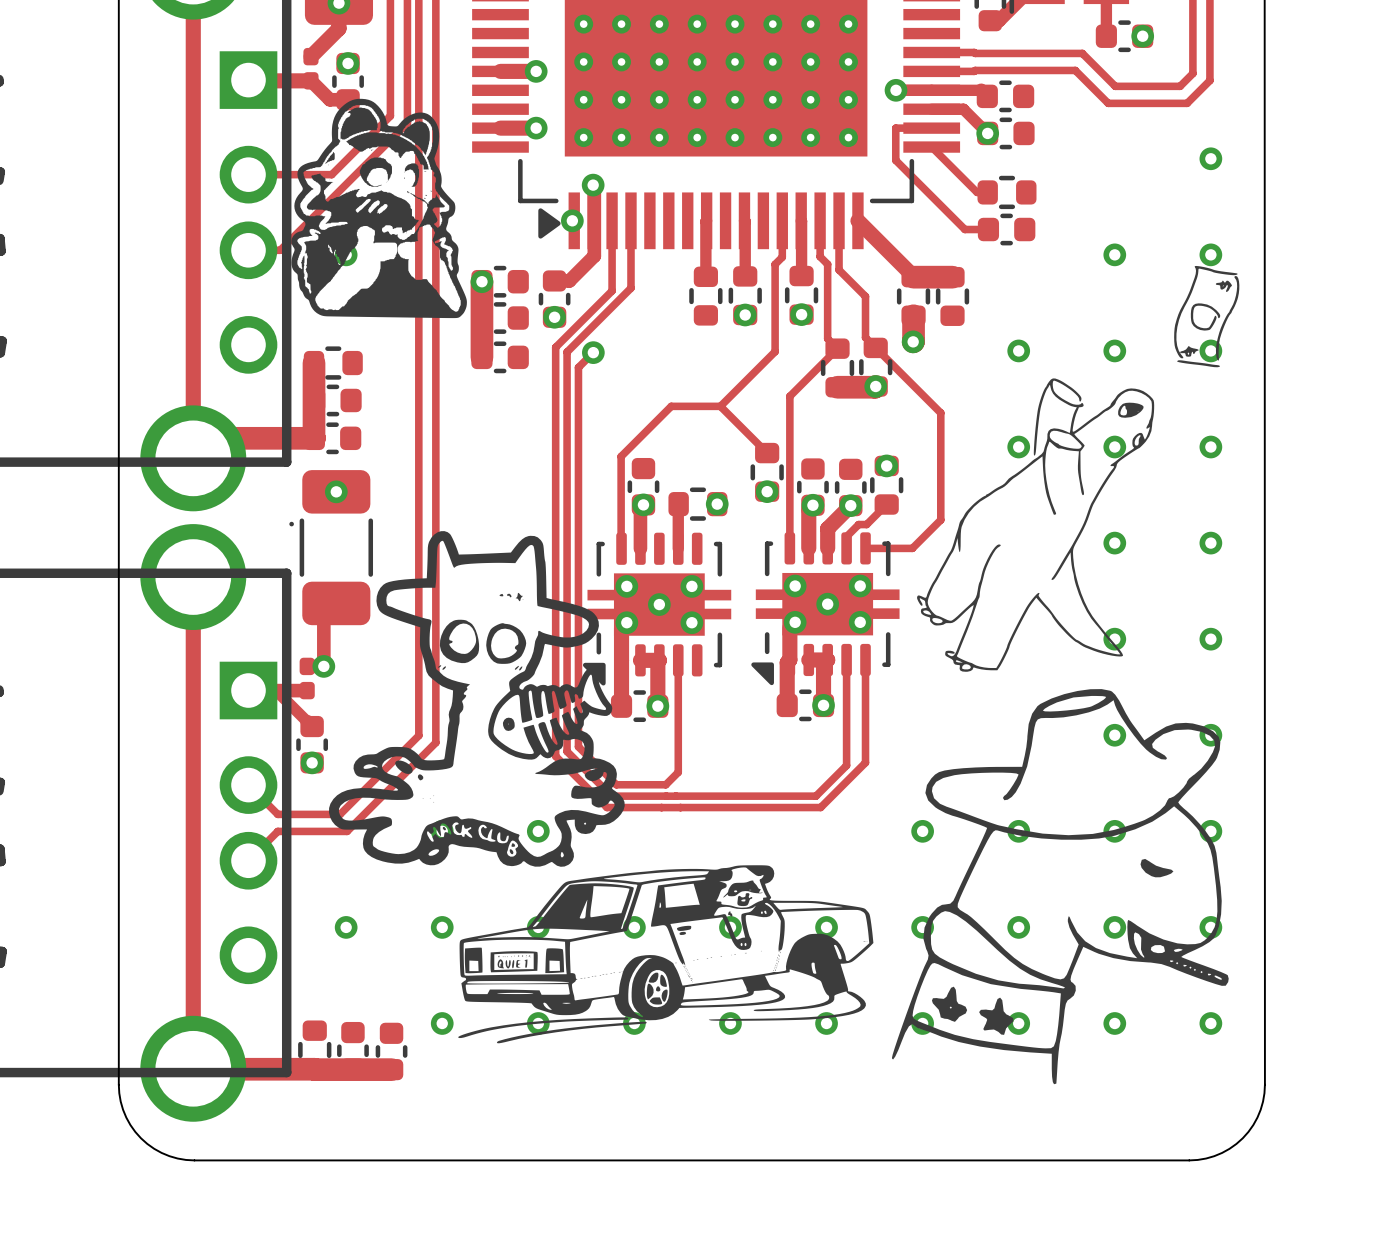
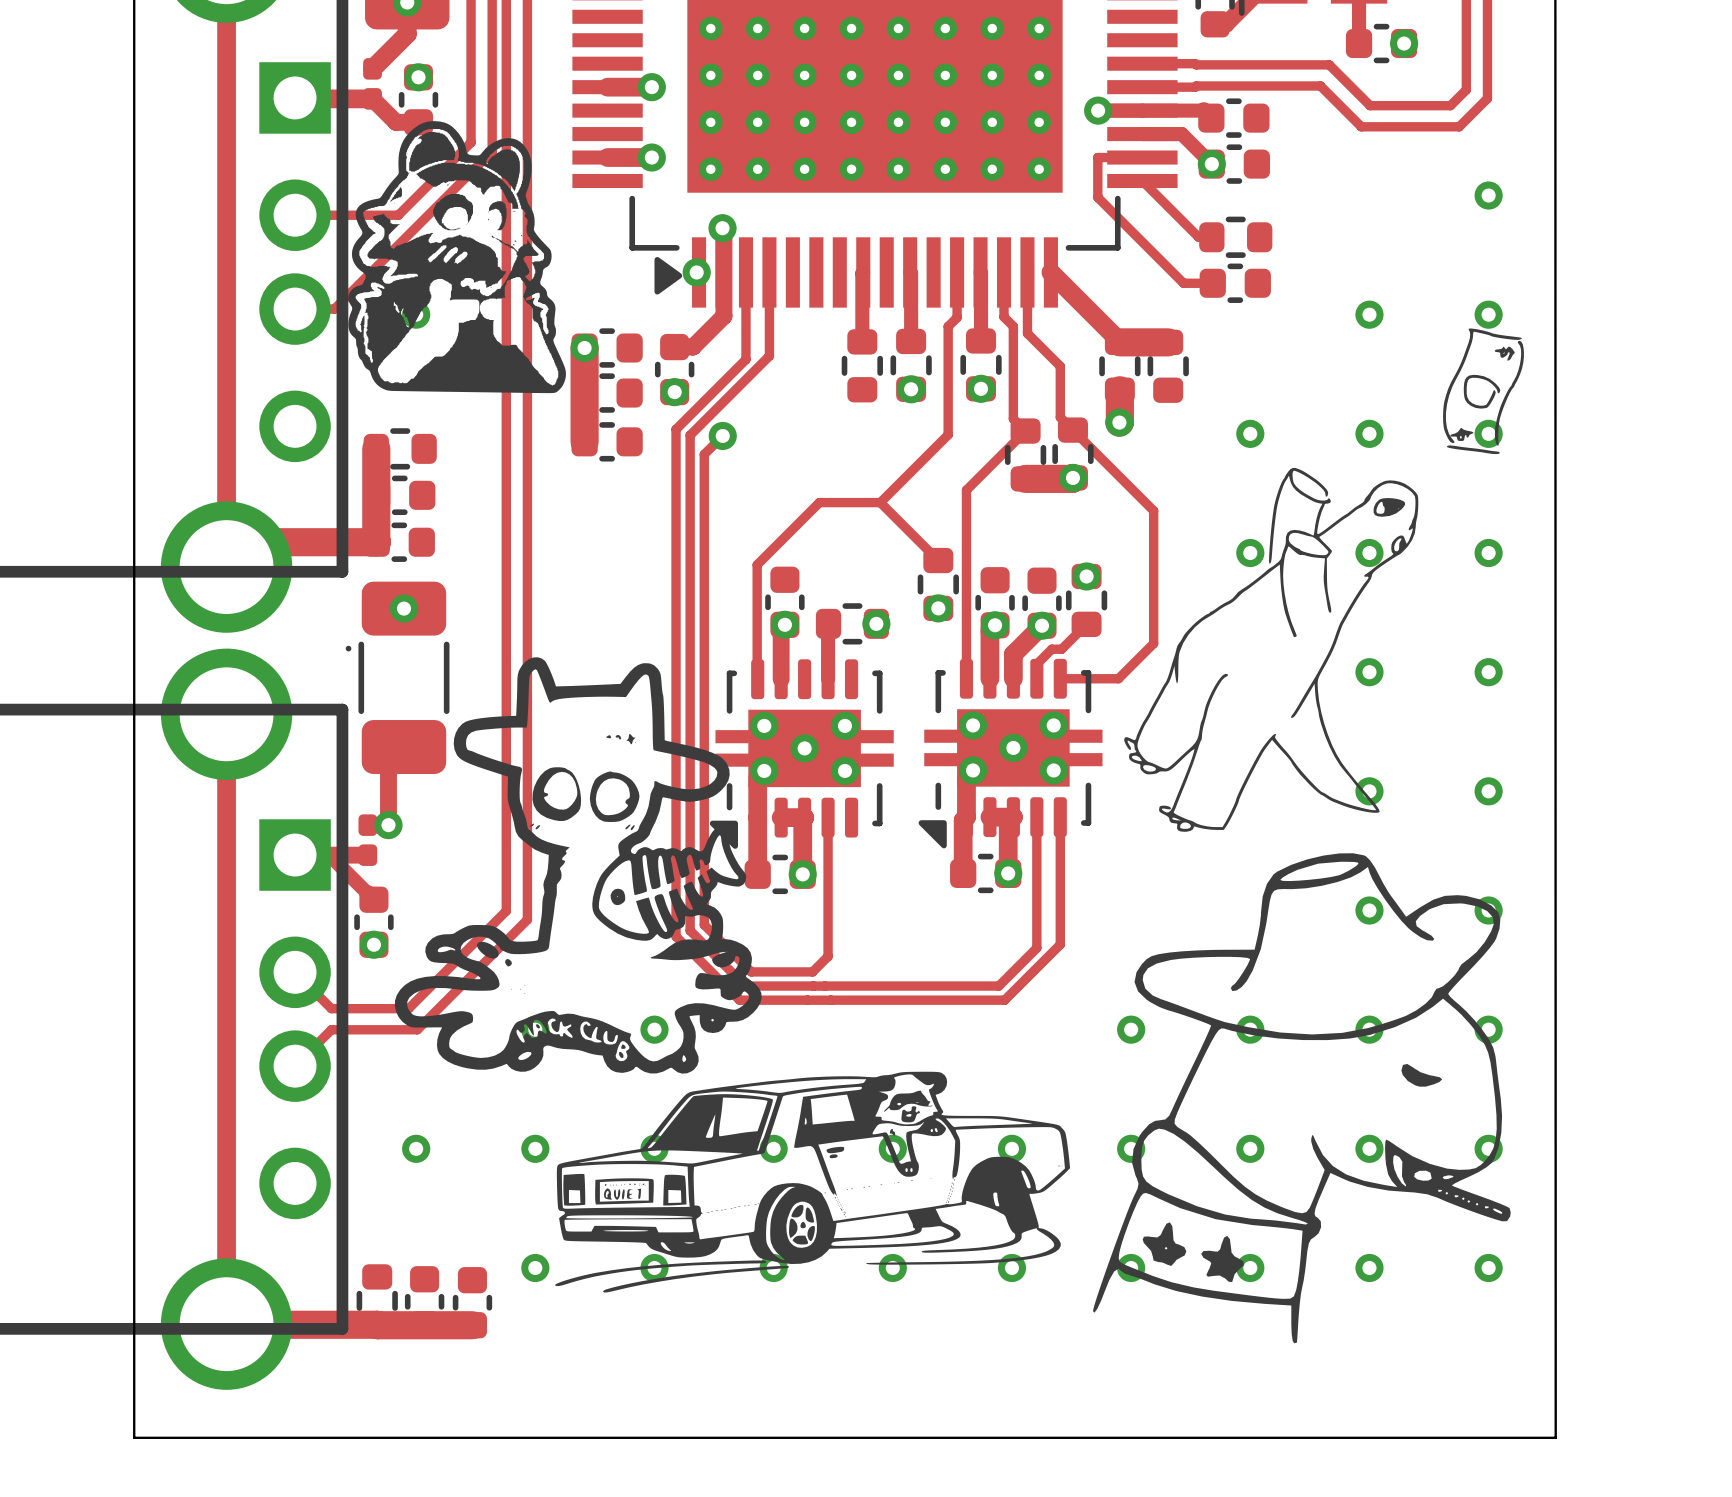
board edge: (118, 1084) (120, 1101) (126, 1117) (140, 1138) (161, 1152) (177, 1158) (194, 1160) -> (134, 1343) (134, 1437) (228, 1437)
board edge: (1264, 1084) (1263, 1101) (1257, 1117) (1242, 1138) (1229, 1148) (1214, 1156) (1189, 1160) -> (1555, 1343) (1555, 1437) (1461, 1437)

